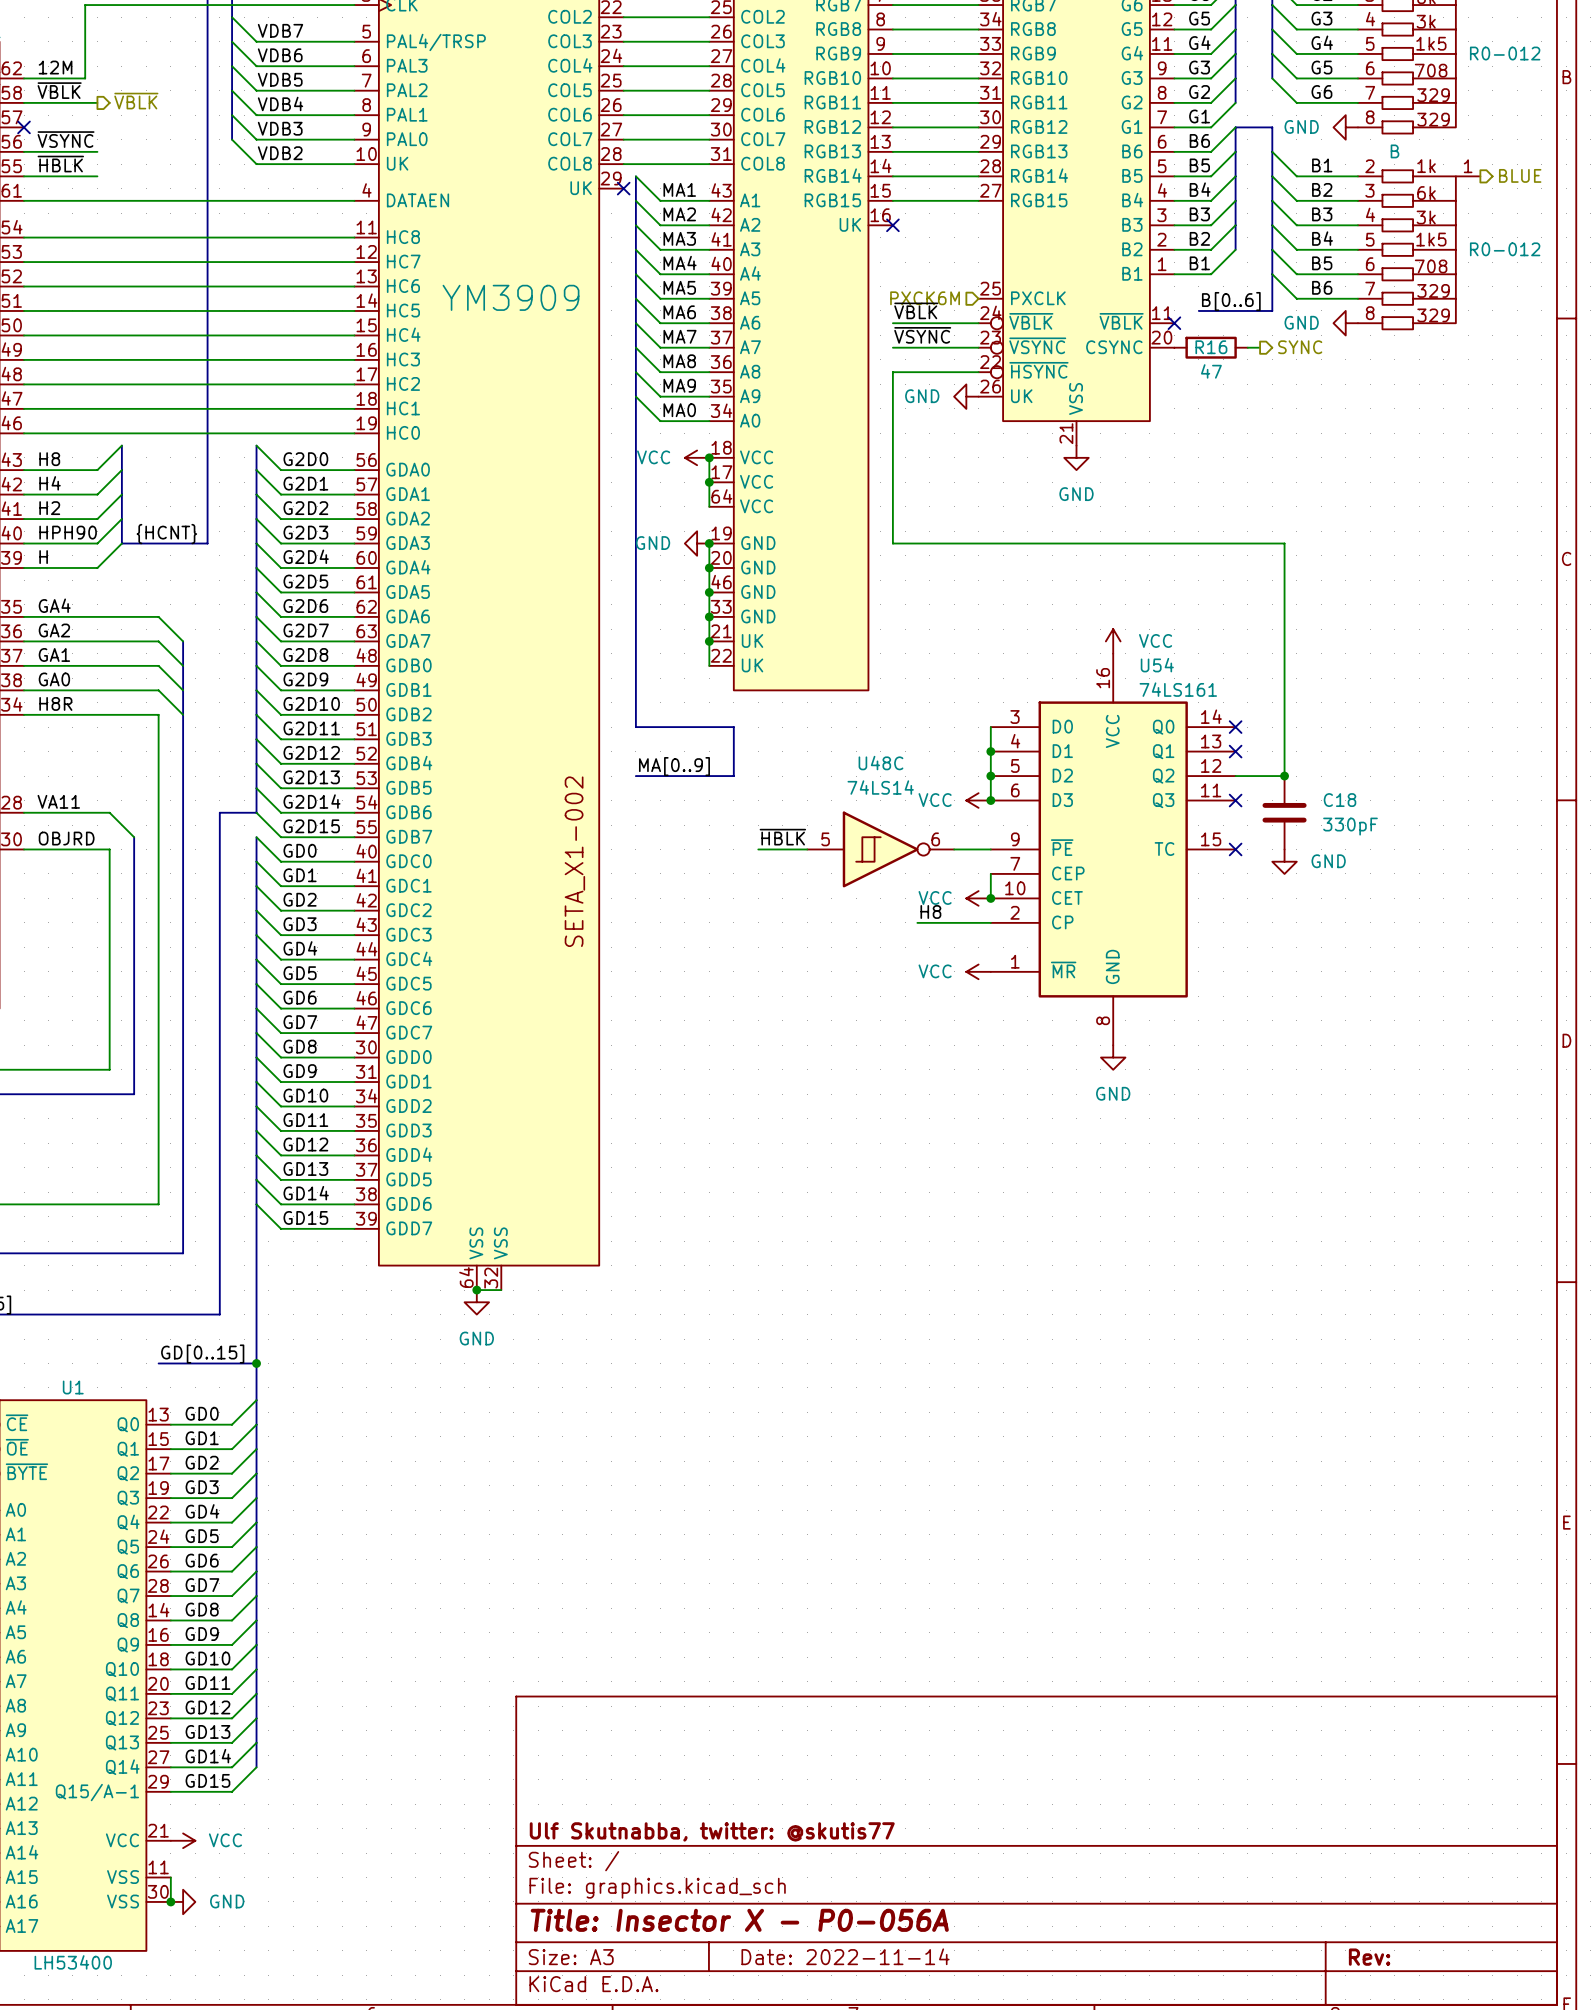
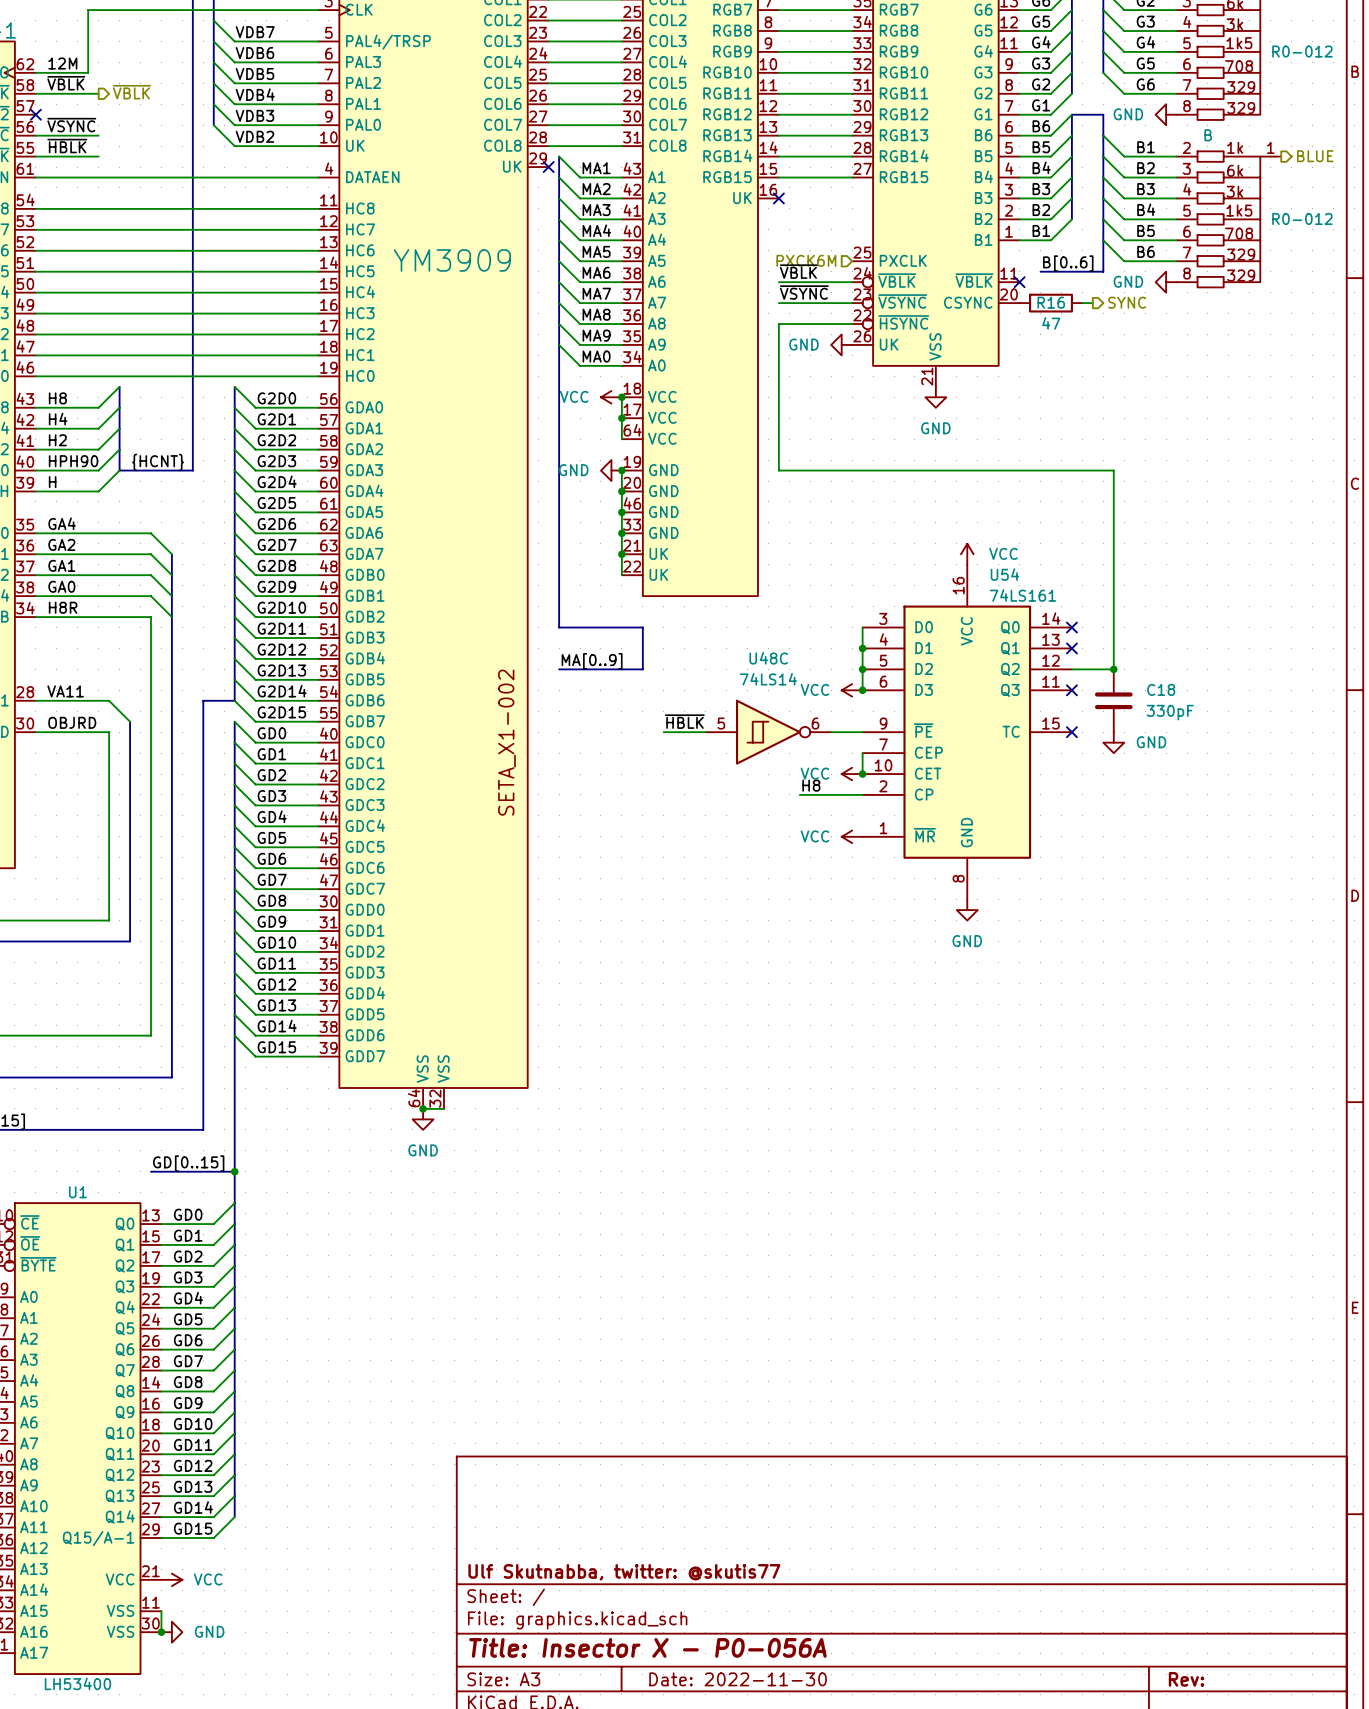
title block: Date: 2022-11-14 (845, 1956) -> Date: 2022-11-30 (738, 1679)

